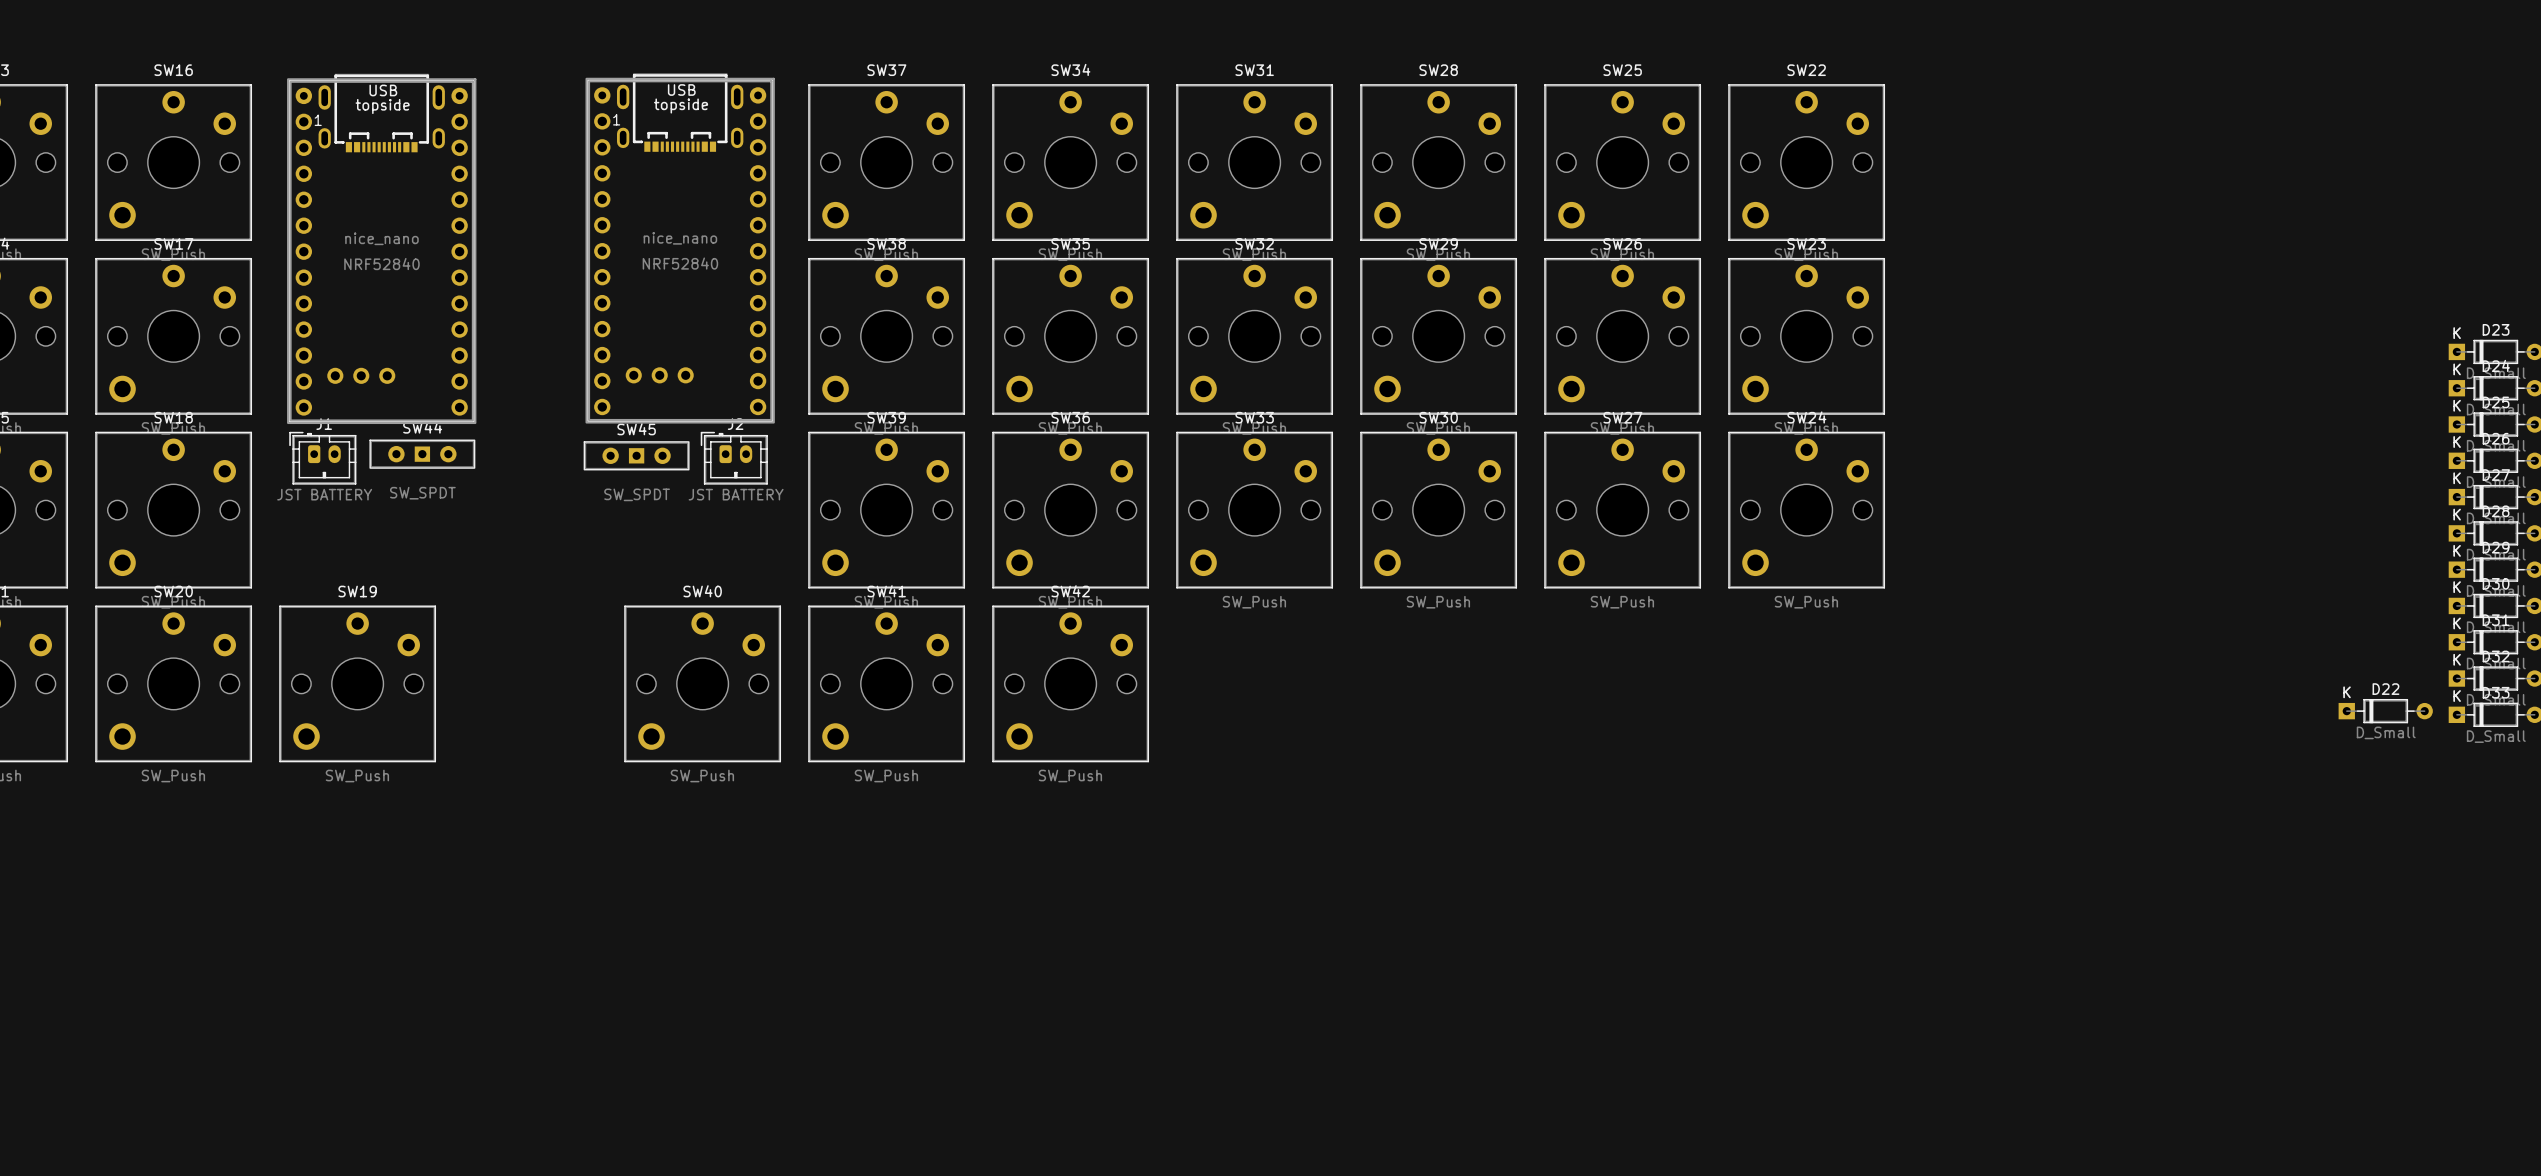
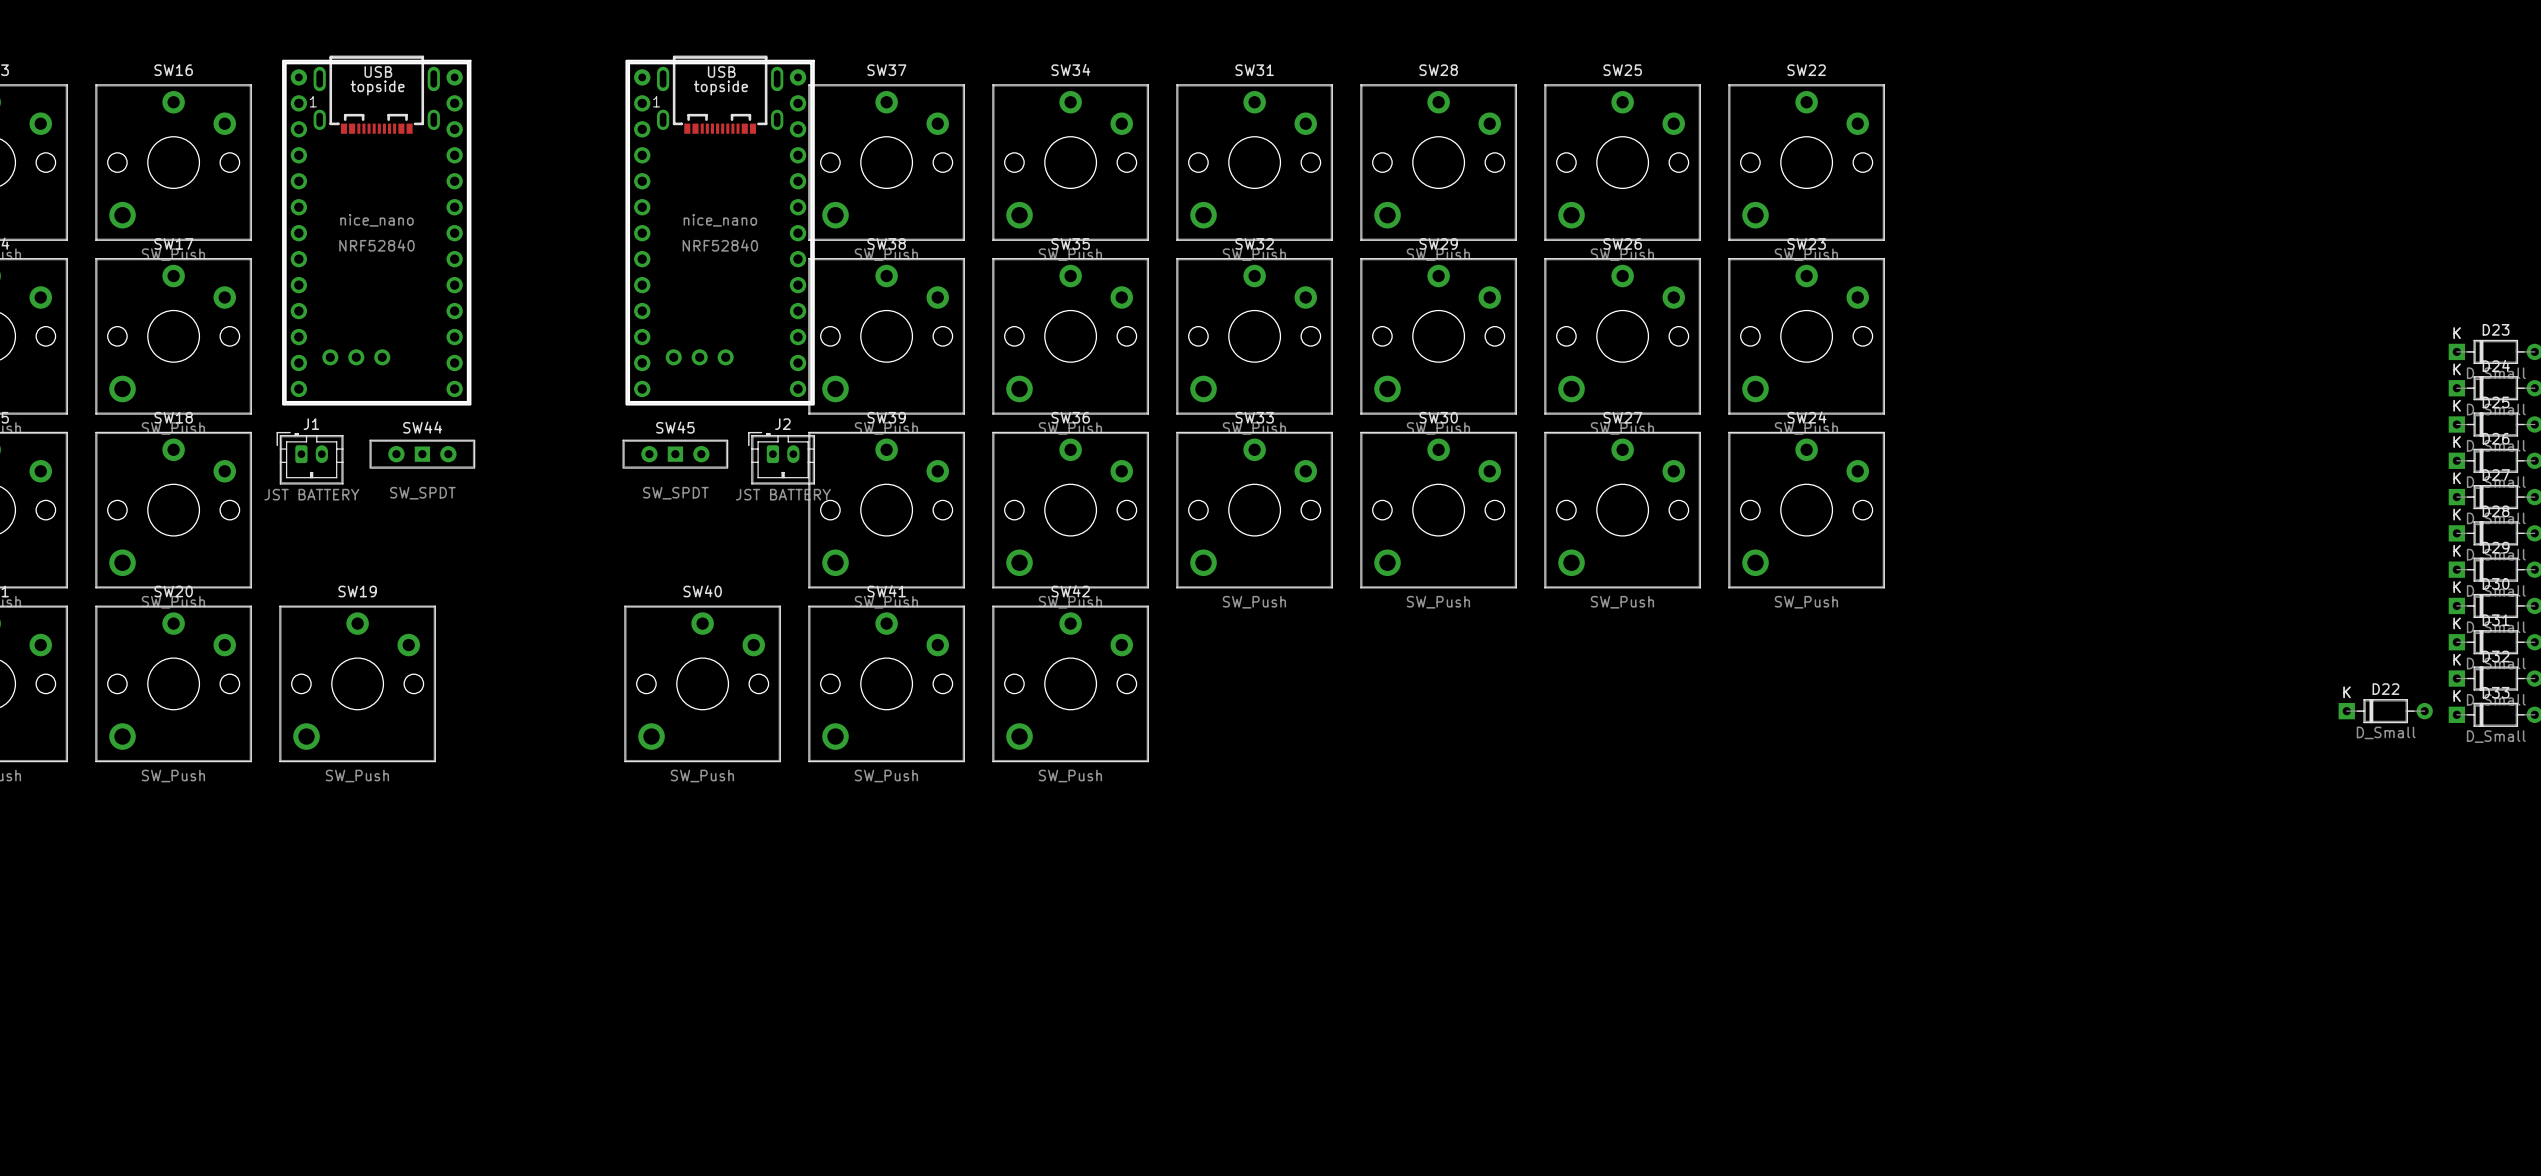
part position: (680, 248) -> (720, 230)
part position: (381, 249) -> (376, 230)
SW45 position: (636, 455) -> (675, 454)
J1 position: (322, 458) -> (310, 458)
J2 position: (734, 458) -> (781, 458)

